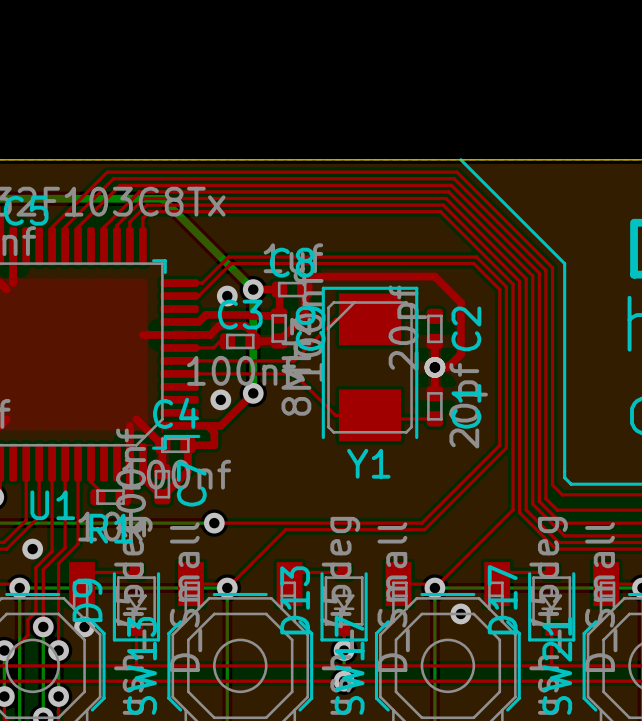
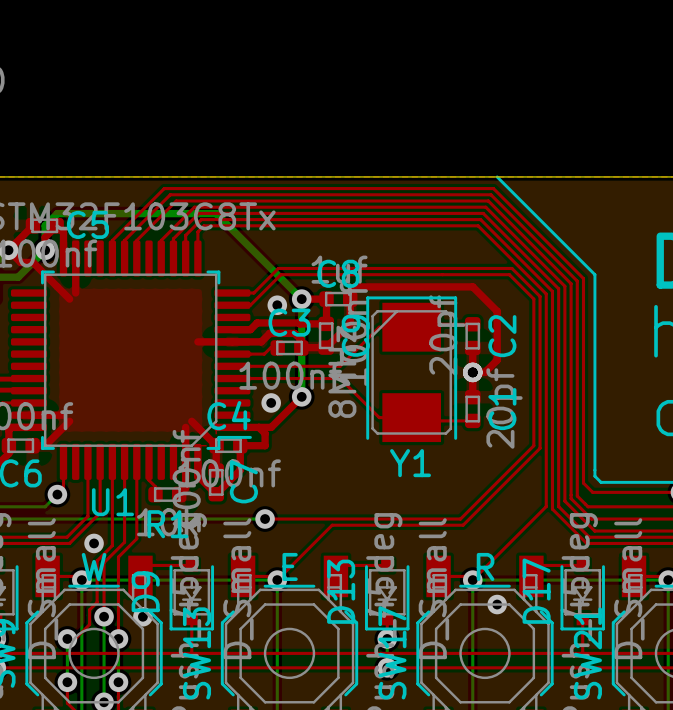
text: none -> W (94, 566)
text: none -> E (290, 566)
text: none -> R (485, 566)

